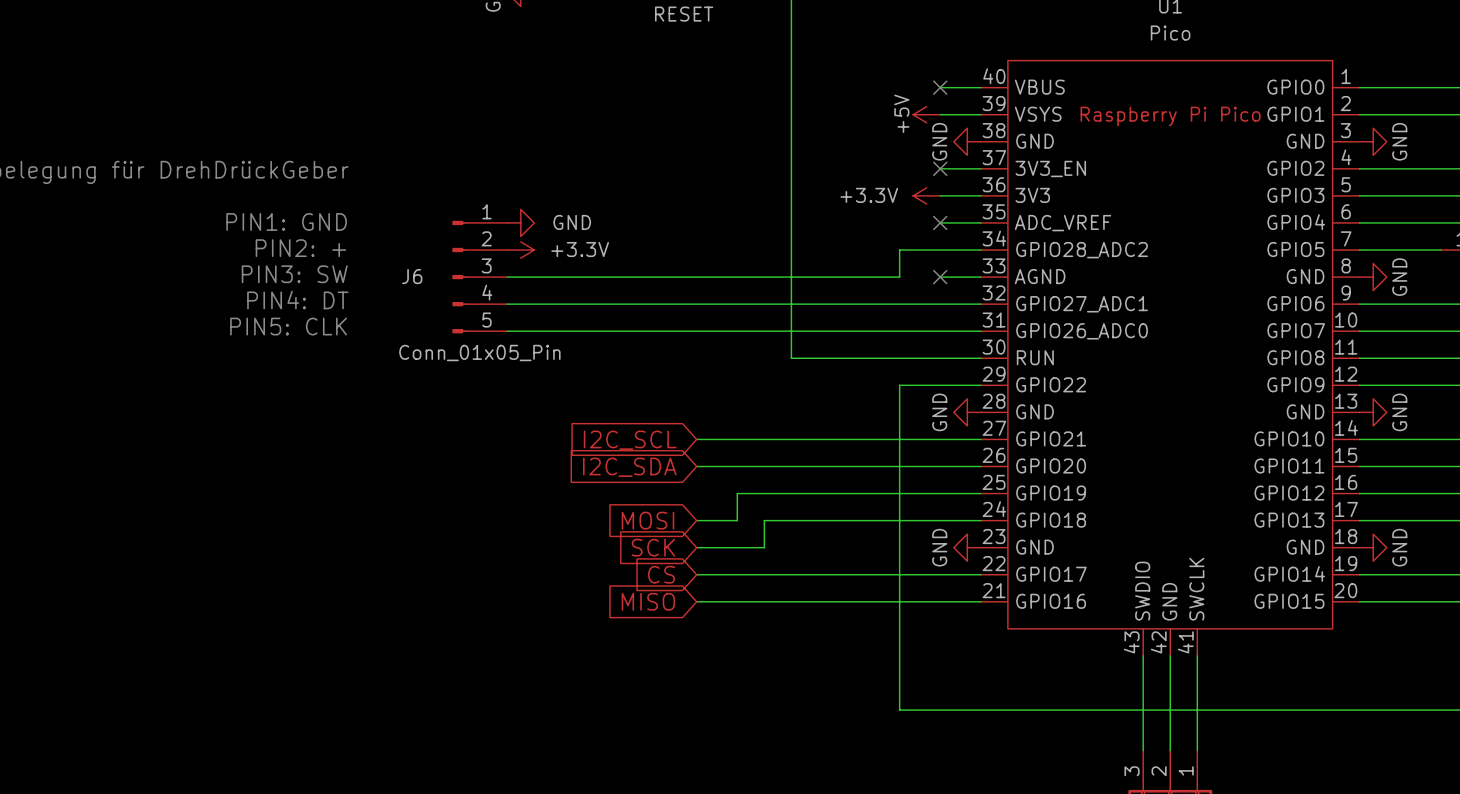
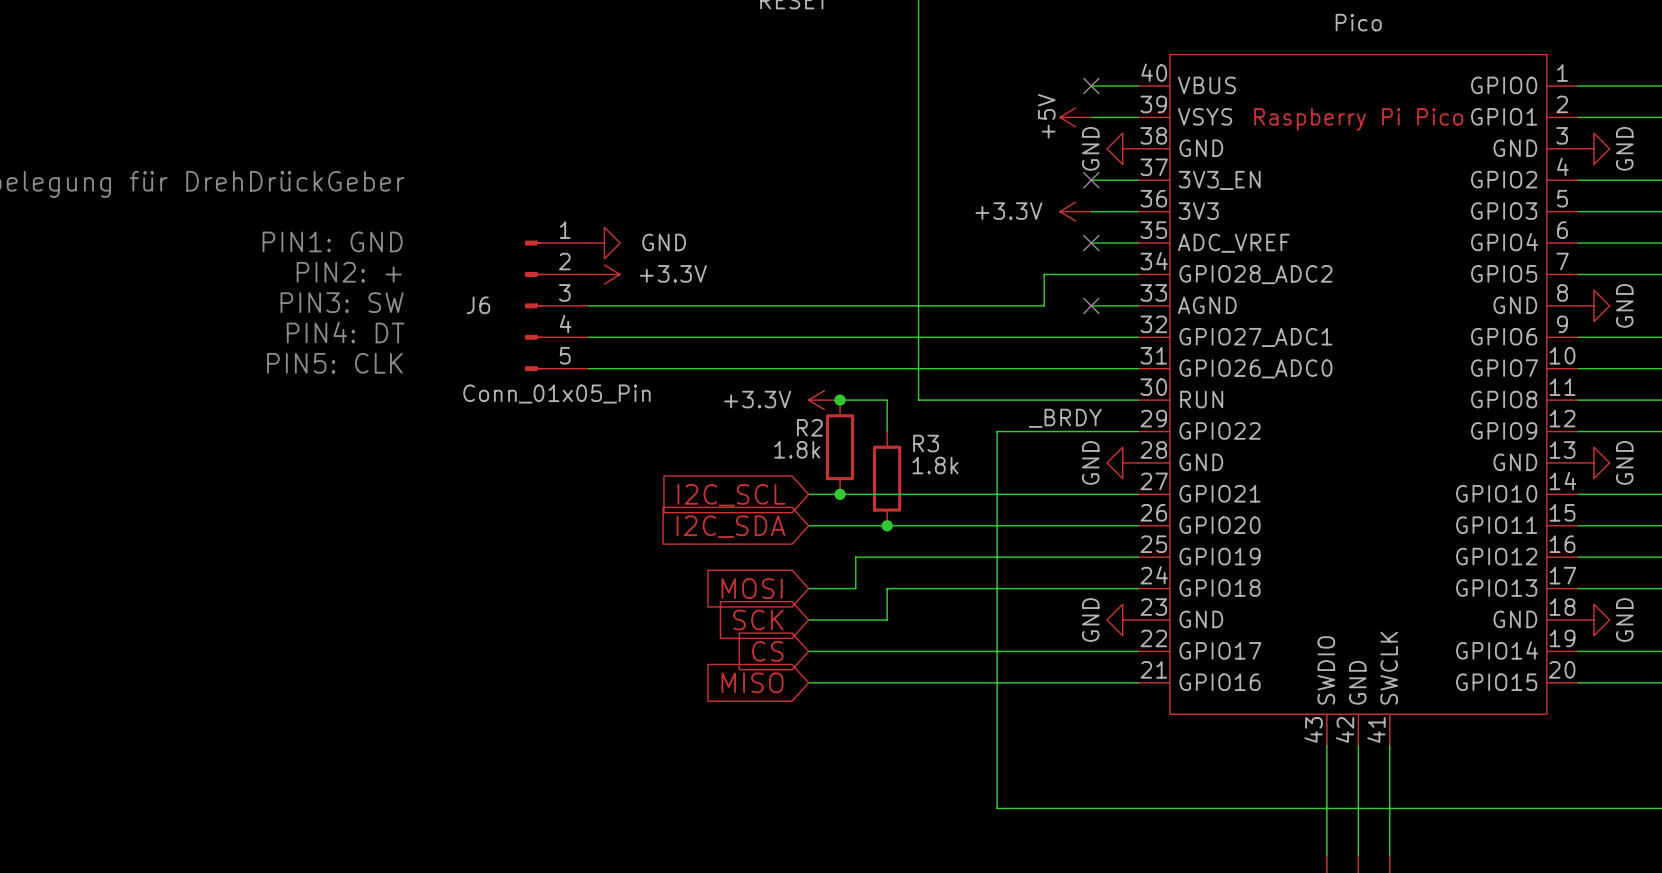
power symbol: none -> +3.3V (824, 400)
wire: none -> (840, 400) (887, 400) (887, 431)
junction: none -> (840, 400)
label: none -> _BRDY (1065, 418)
wire: (899, 385) (899, 710) -> (1044, 431) (997, 431) (997, 808) (1044, 808)
R2: none -> 1.8k (840, 447)
R3: none -> 1.8k (887, 478)
junction: none -> (840, 494)
junction: none -> (887, 525)

